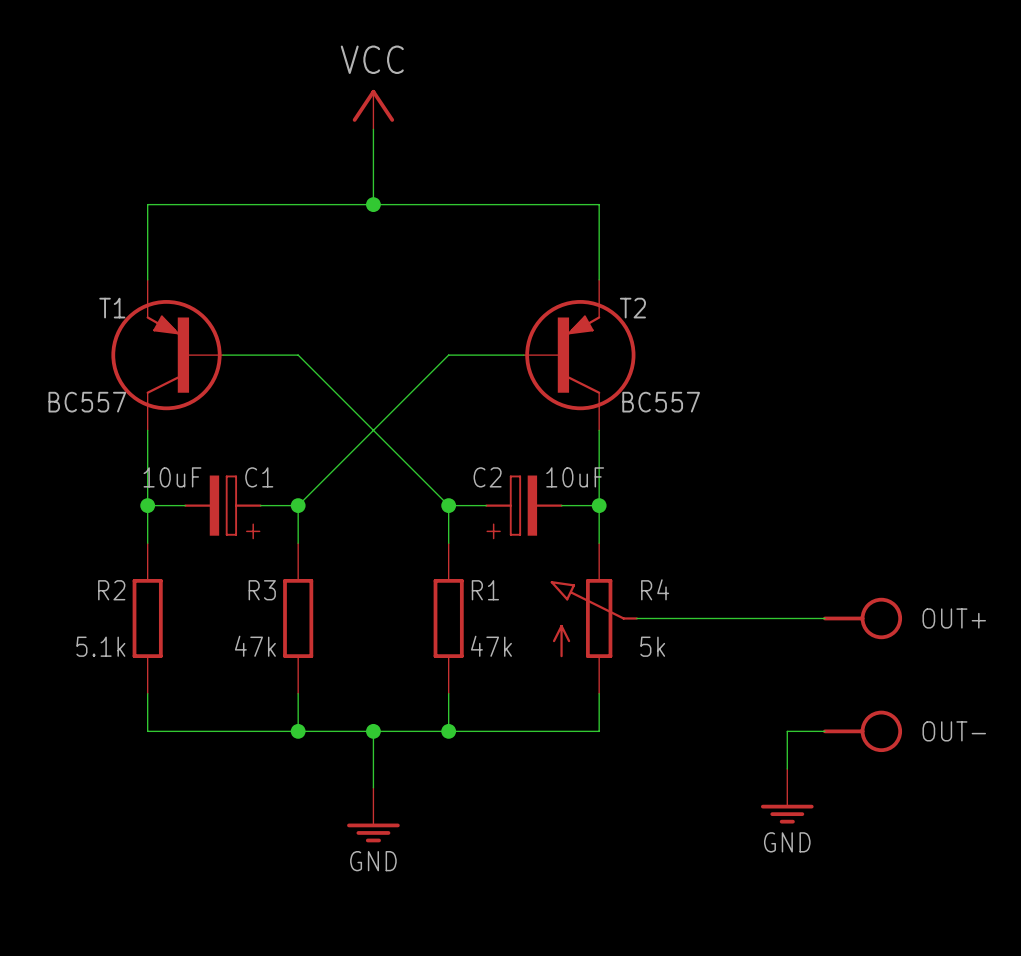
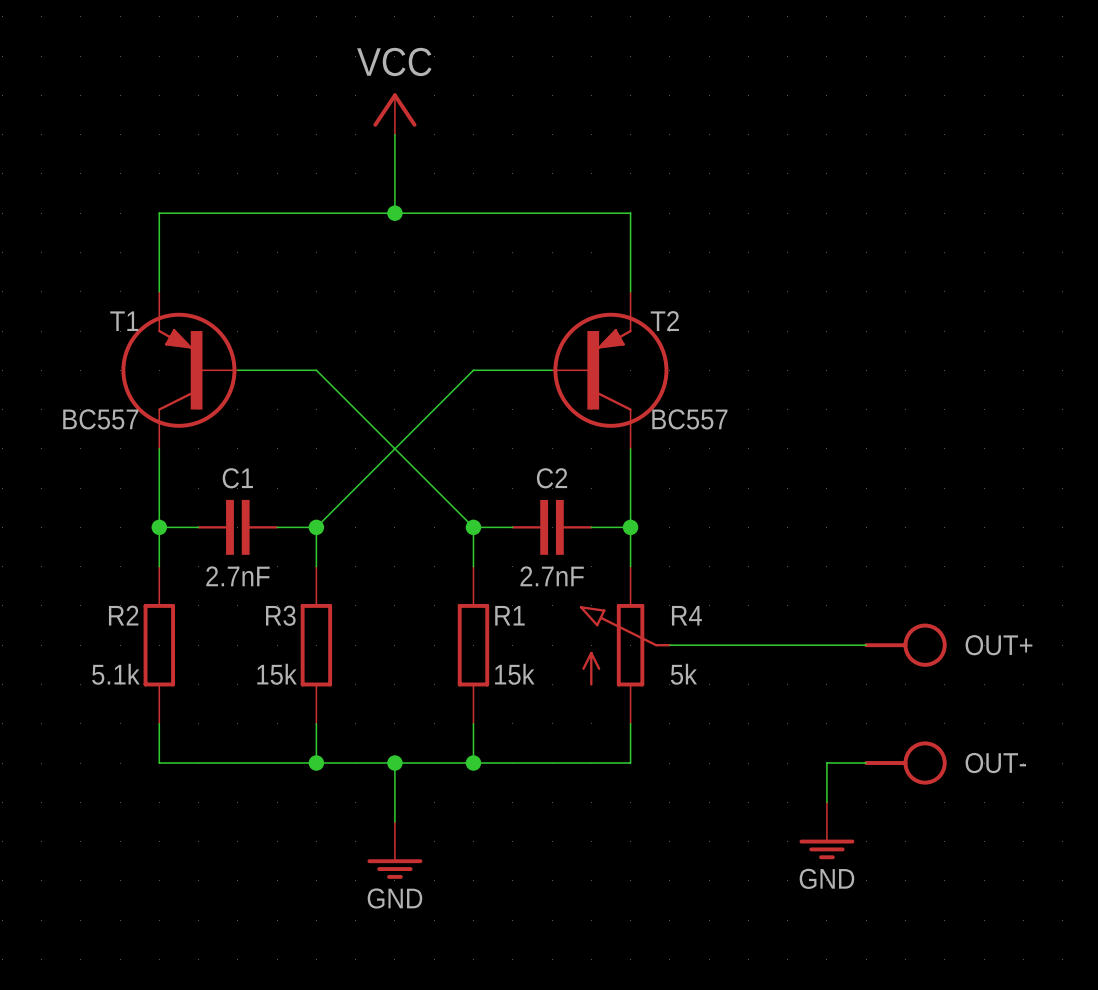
C1 symbol: [184, 475, 262, 536] -> [197, 499, 279, 555]
C2 symbol: [485, 475, 563, 536] -> [511, 499, 593, 555]
C1 value: 10uF (172, 477) -> 2.7nF (237, 576)
C1 name position: C1 (259, 477) -> C1 (237, 478)
C2 name position: C2 (487, 477) -> C2 (552, 478)
C2 value: 10uF (575, 477) -> 2.7nF (552, 576)
R3 value: 47k (255, 646) -> 15k (277, 674)
R1 value: 47k (491, 646) -> 15k (514, 674)

